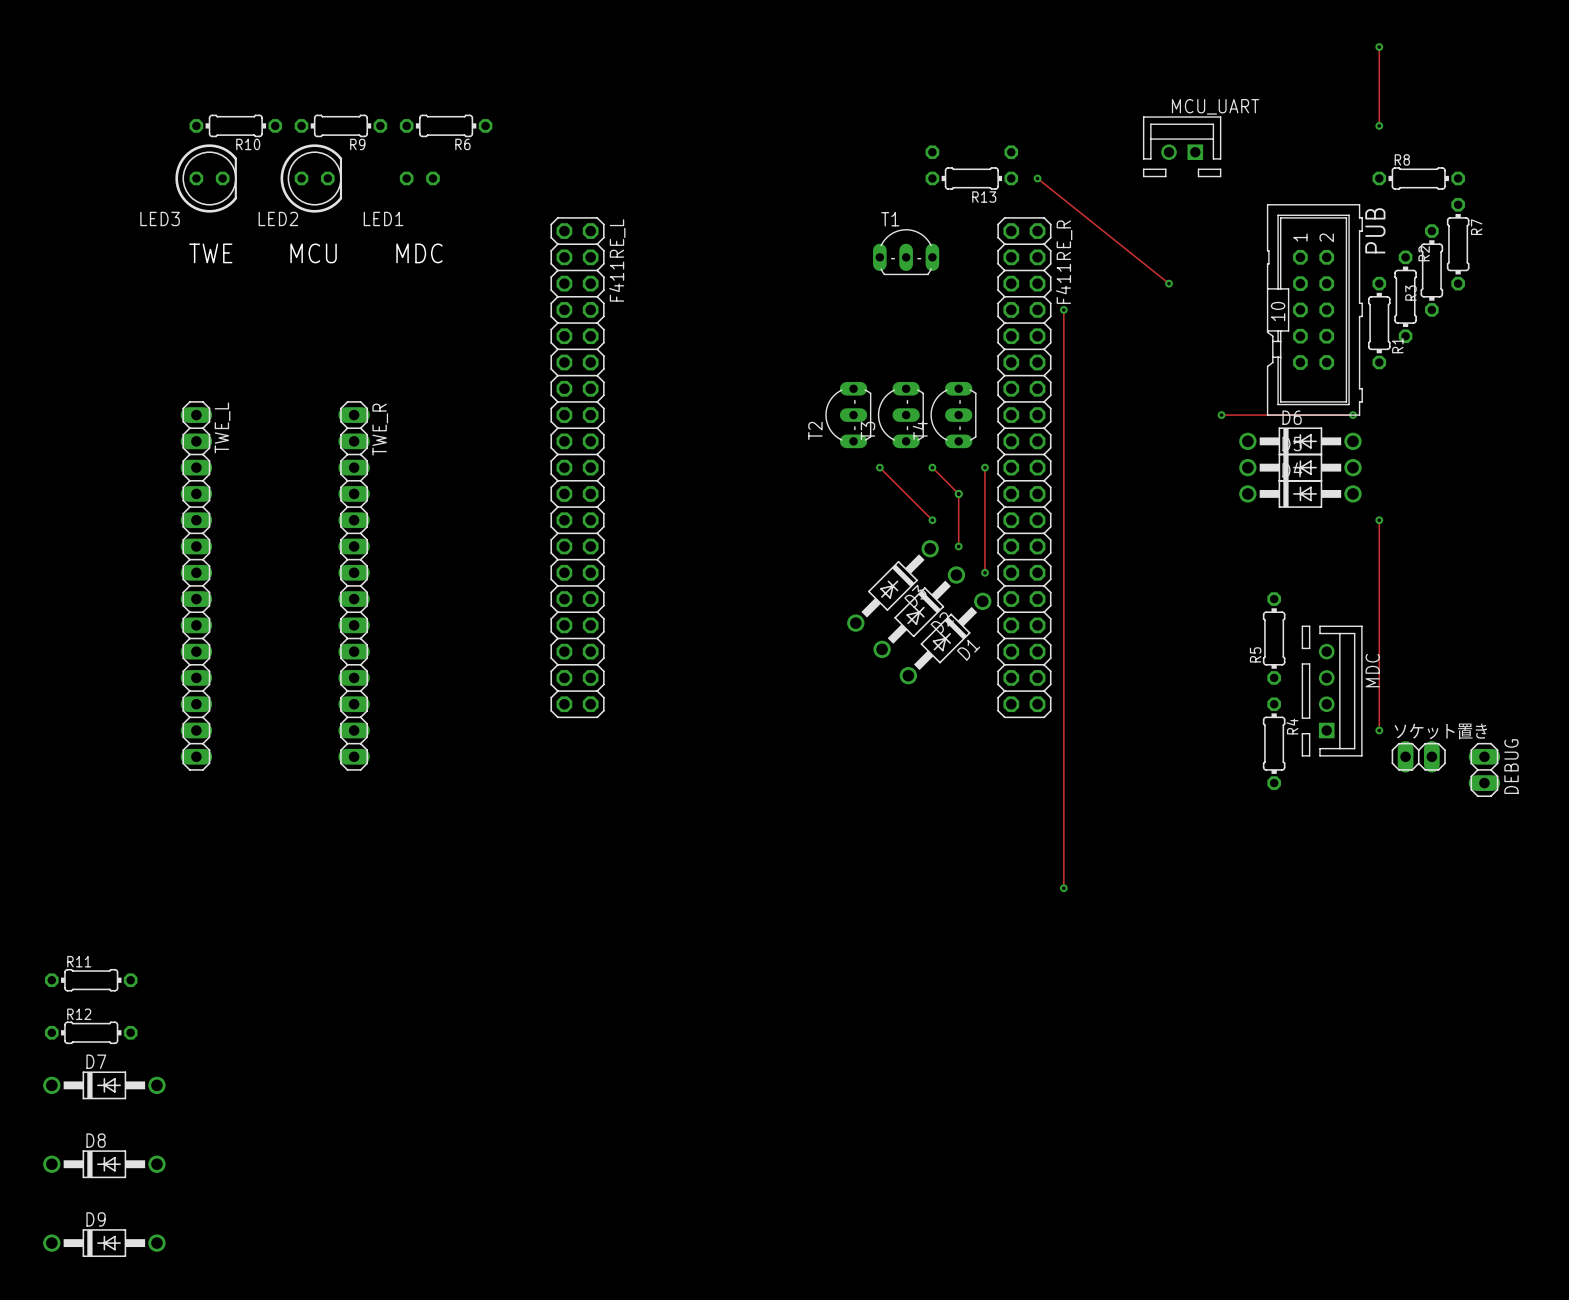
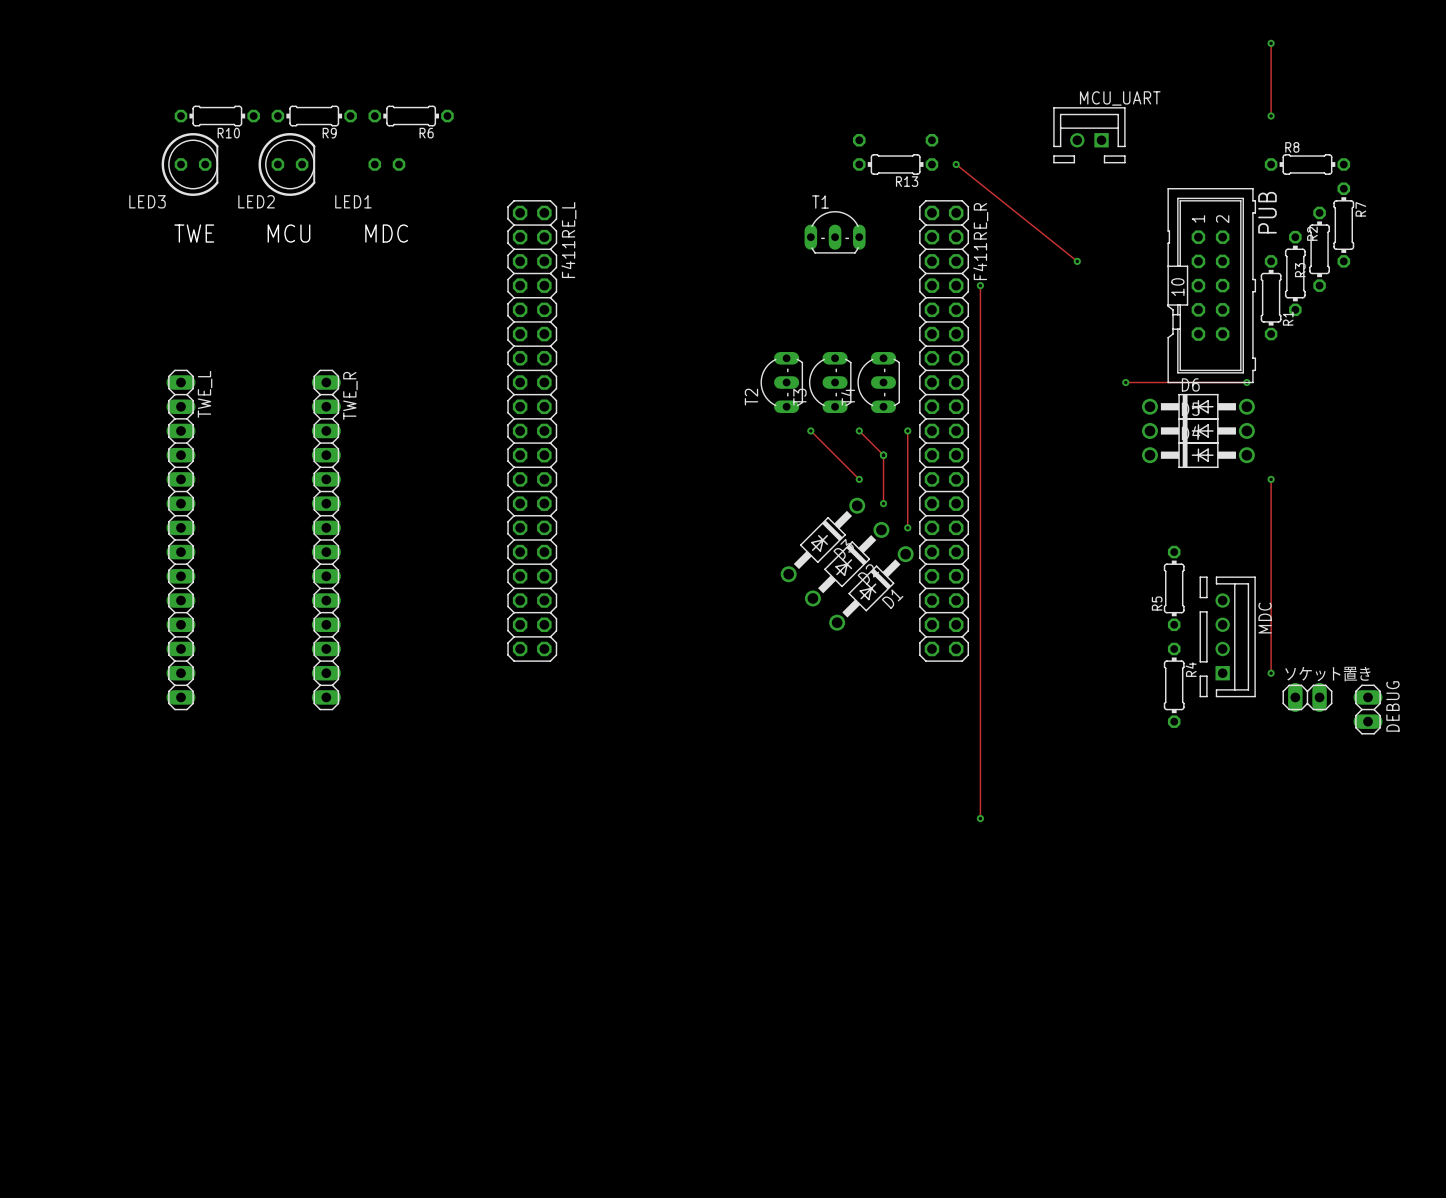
R11: (91, 980) -> none
R12: (91, 1032) -> none
D7: (104, 1085) -> none
D8: (104, 1164) -> none
D9: (104, 1243) -> none

